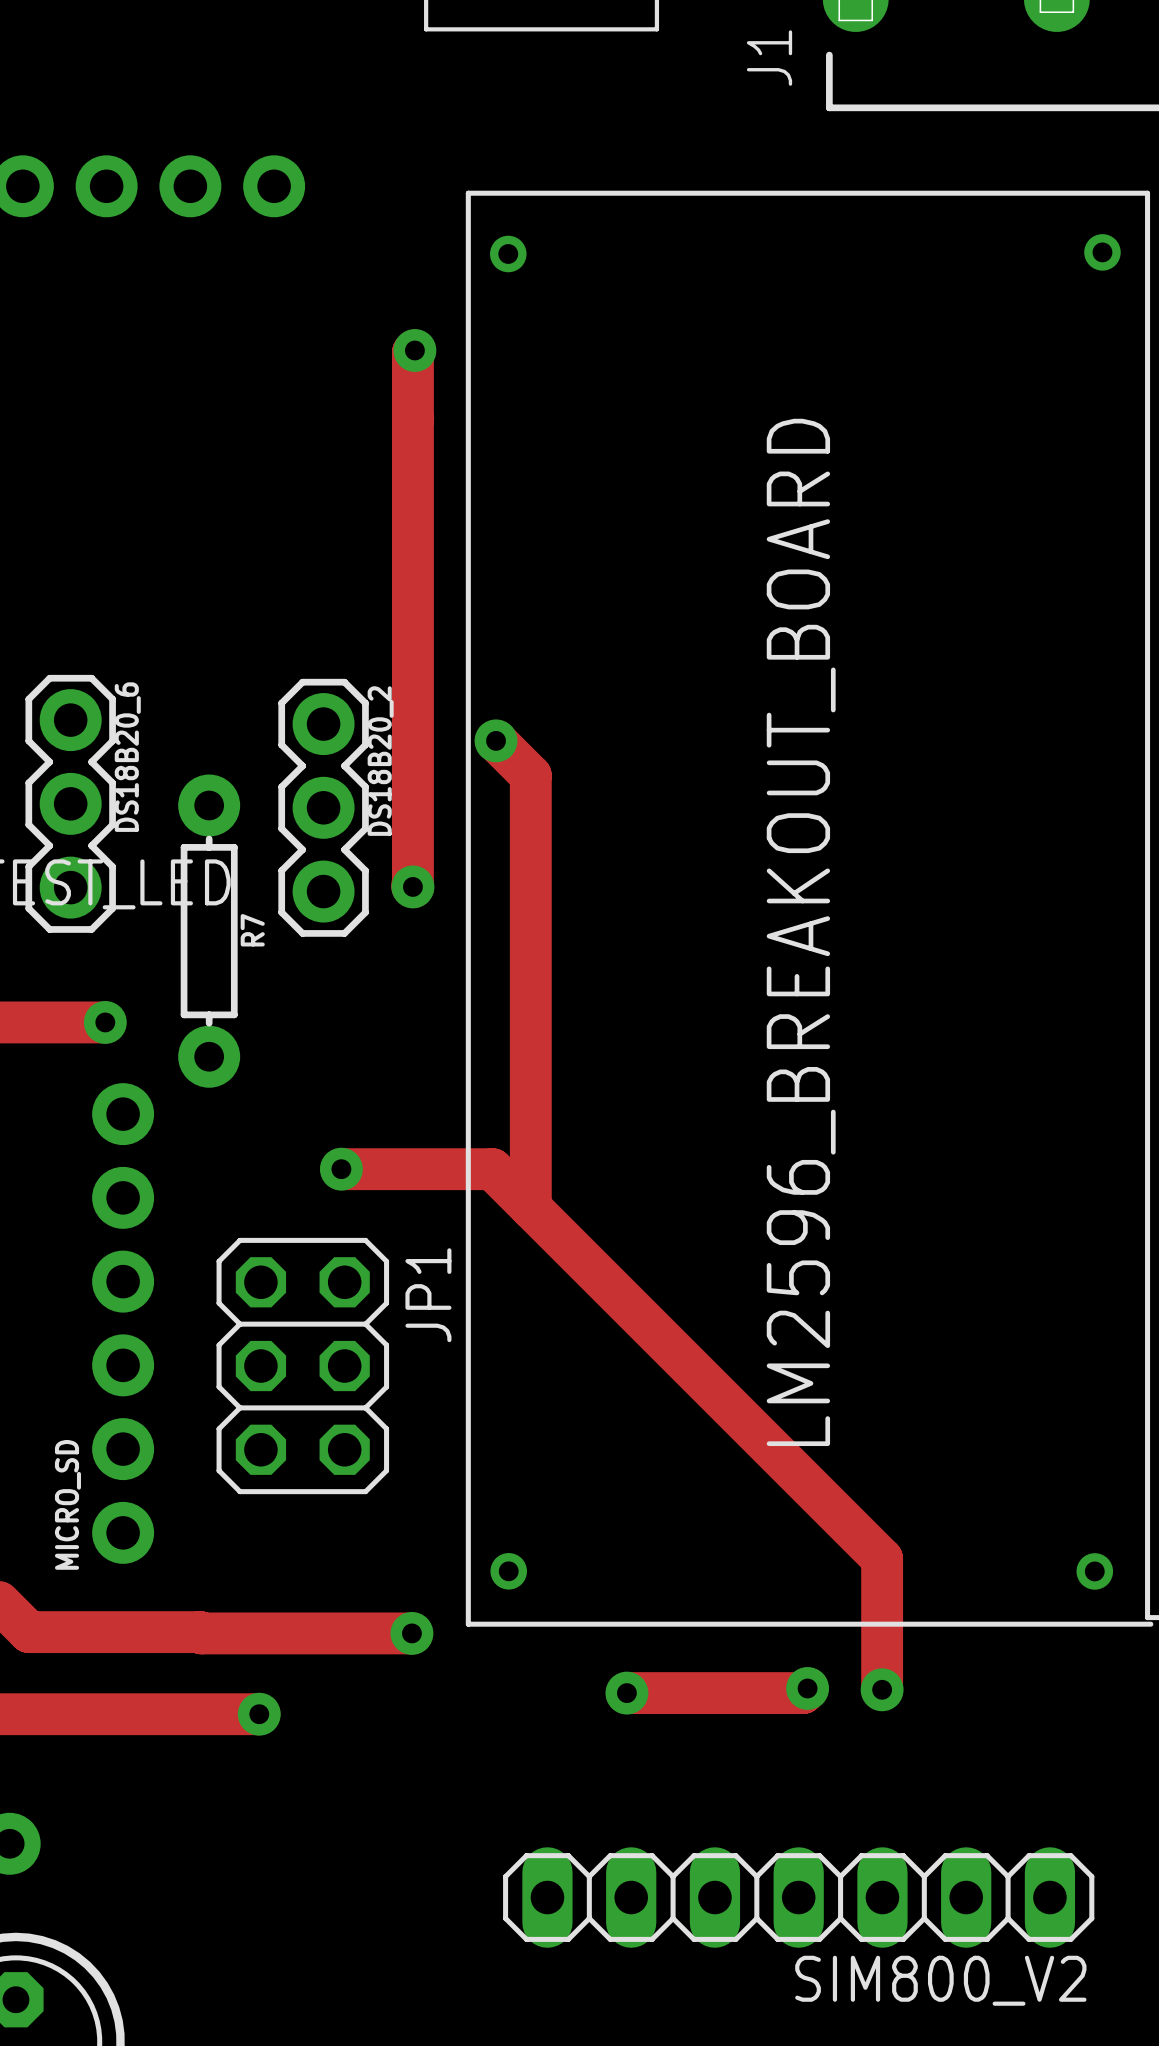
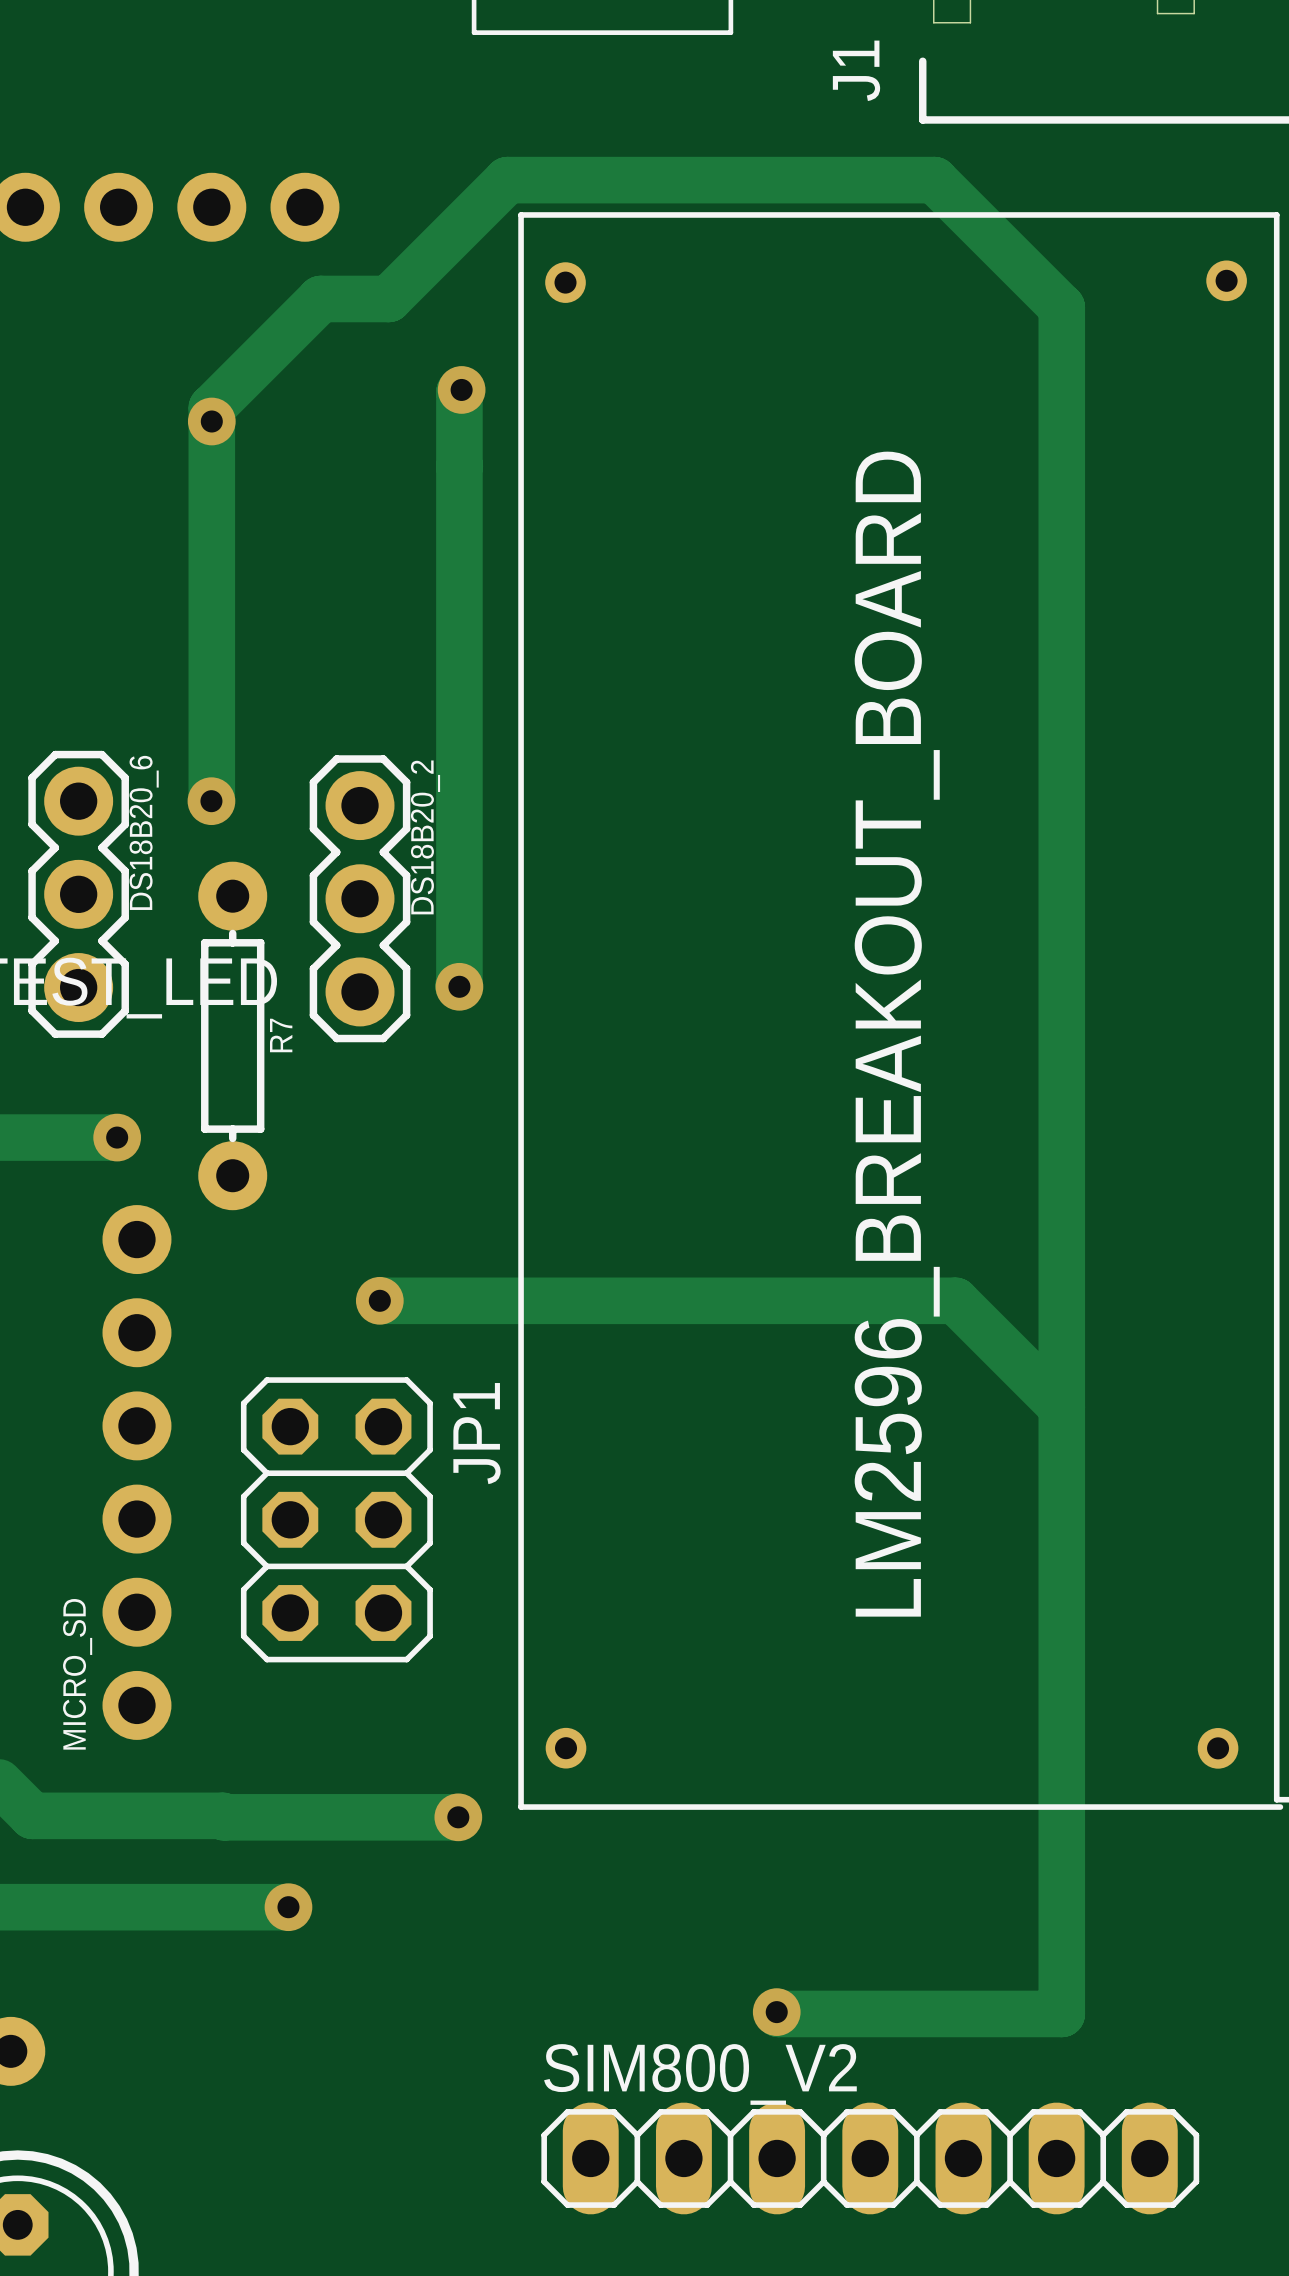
via: none -> (211, 421)
track: none -> (211, 800) (211, 407) (320, 298) (388, 298) (507, 180) (934, 180) (1061, 307) (1061, 2013) (778, 2013) (776, 2012)
via: none -> (211, 801)
track: (496, 740) (530, 775) (530, 1207) -> none
via: (496, 740) -> none
track: (492, 1169) (882, 1558) (882, 1689) -> (547, 1300) (955, 1300) (1061, 1407)
track: (807, 1688) (802, 1693) (626, 1693) -> none
via: (807, 1688) -> none
via: (882, 1689) -> none
via: (626, 1693) -> none
via: none -> (776, 2012)
SIM800_V2 position: (798, 1897) -> (870, 2158)
SIM800_V2 name position: SIM800_V2 (940, 1980) -> SIM800_V2 (700, 2074)

